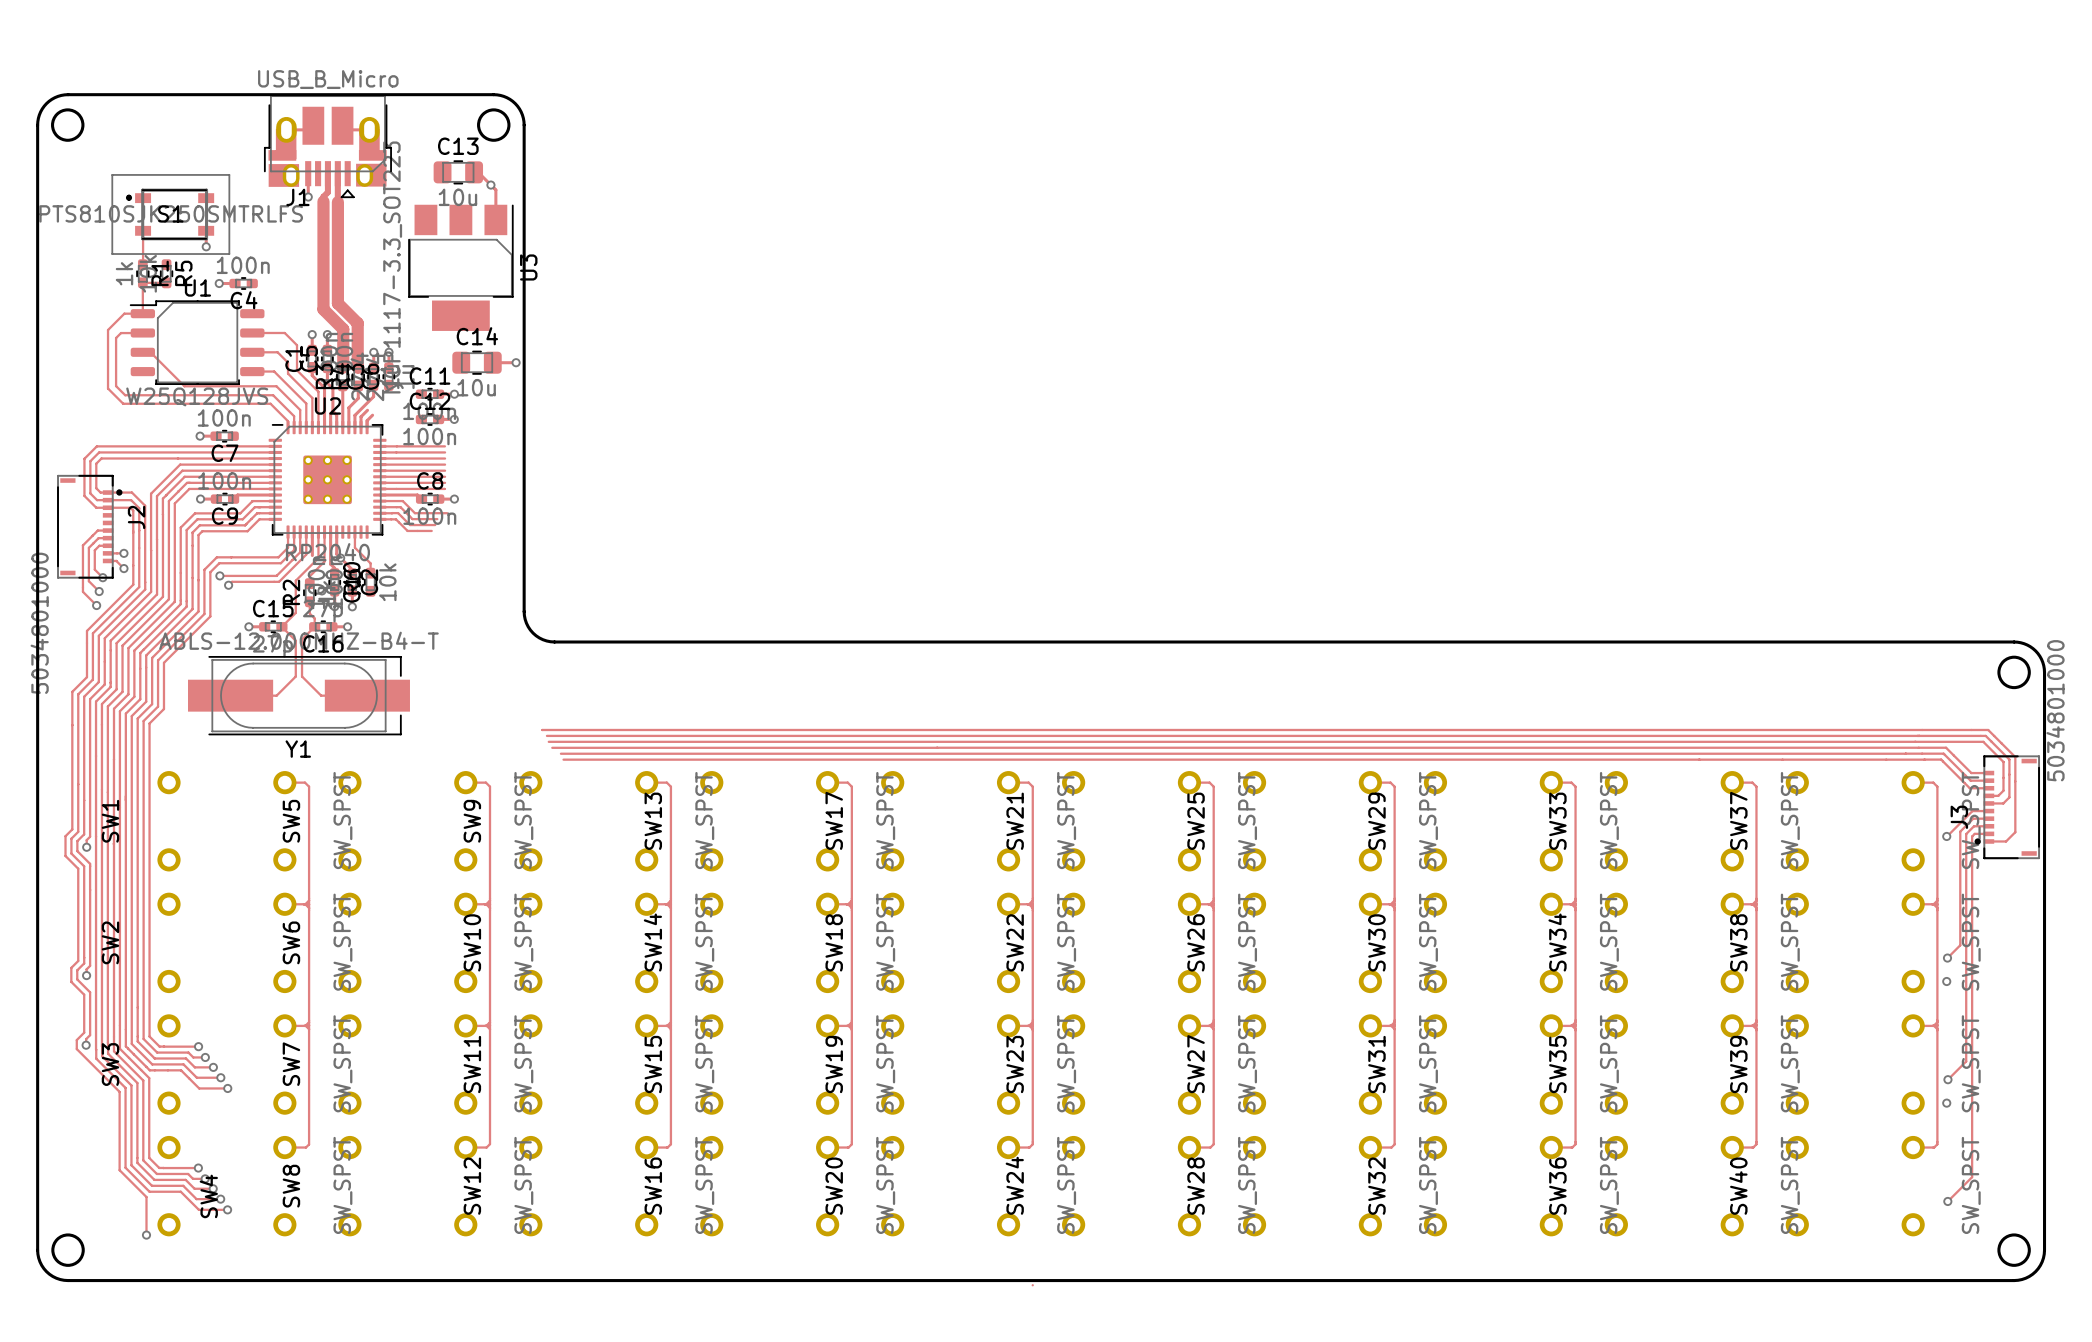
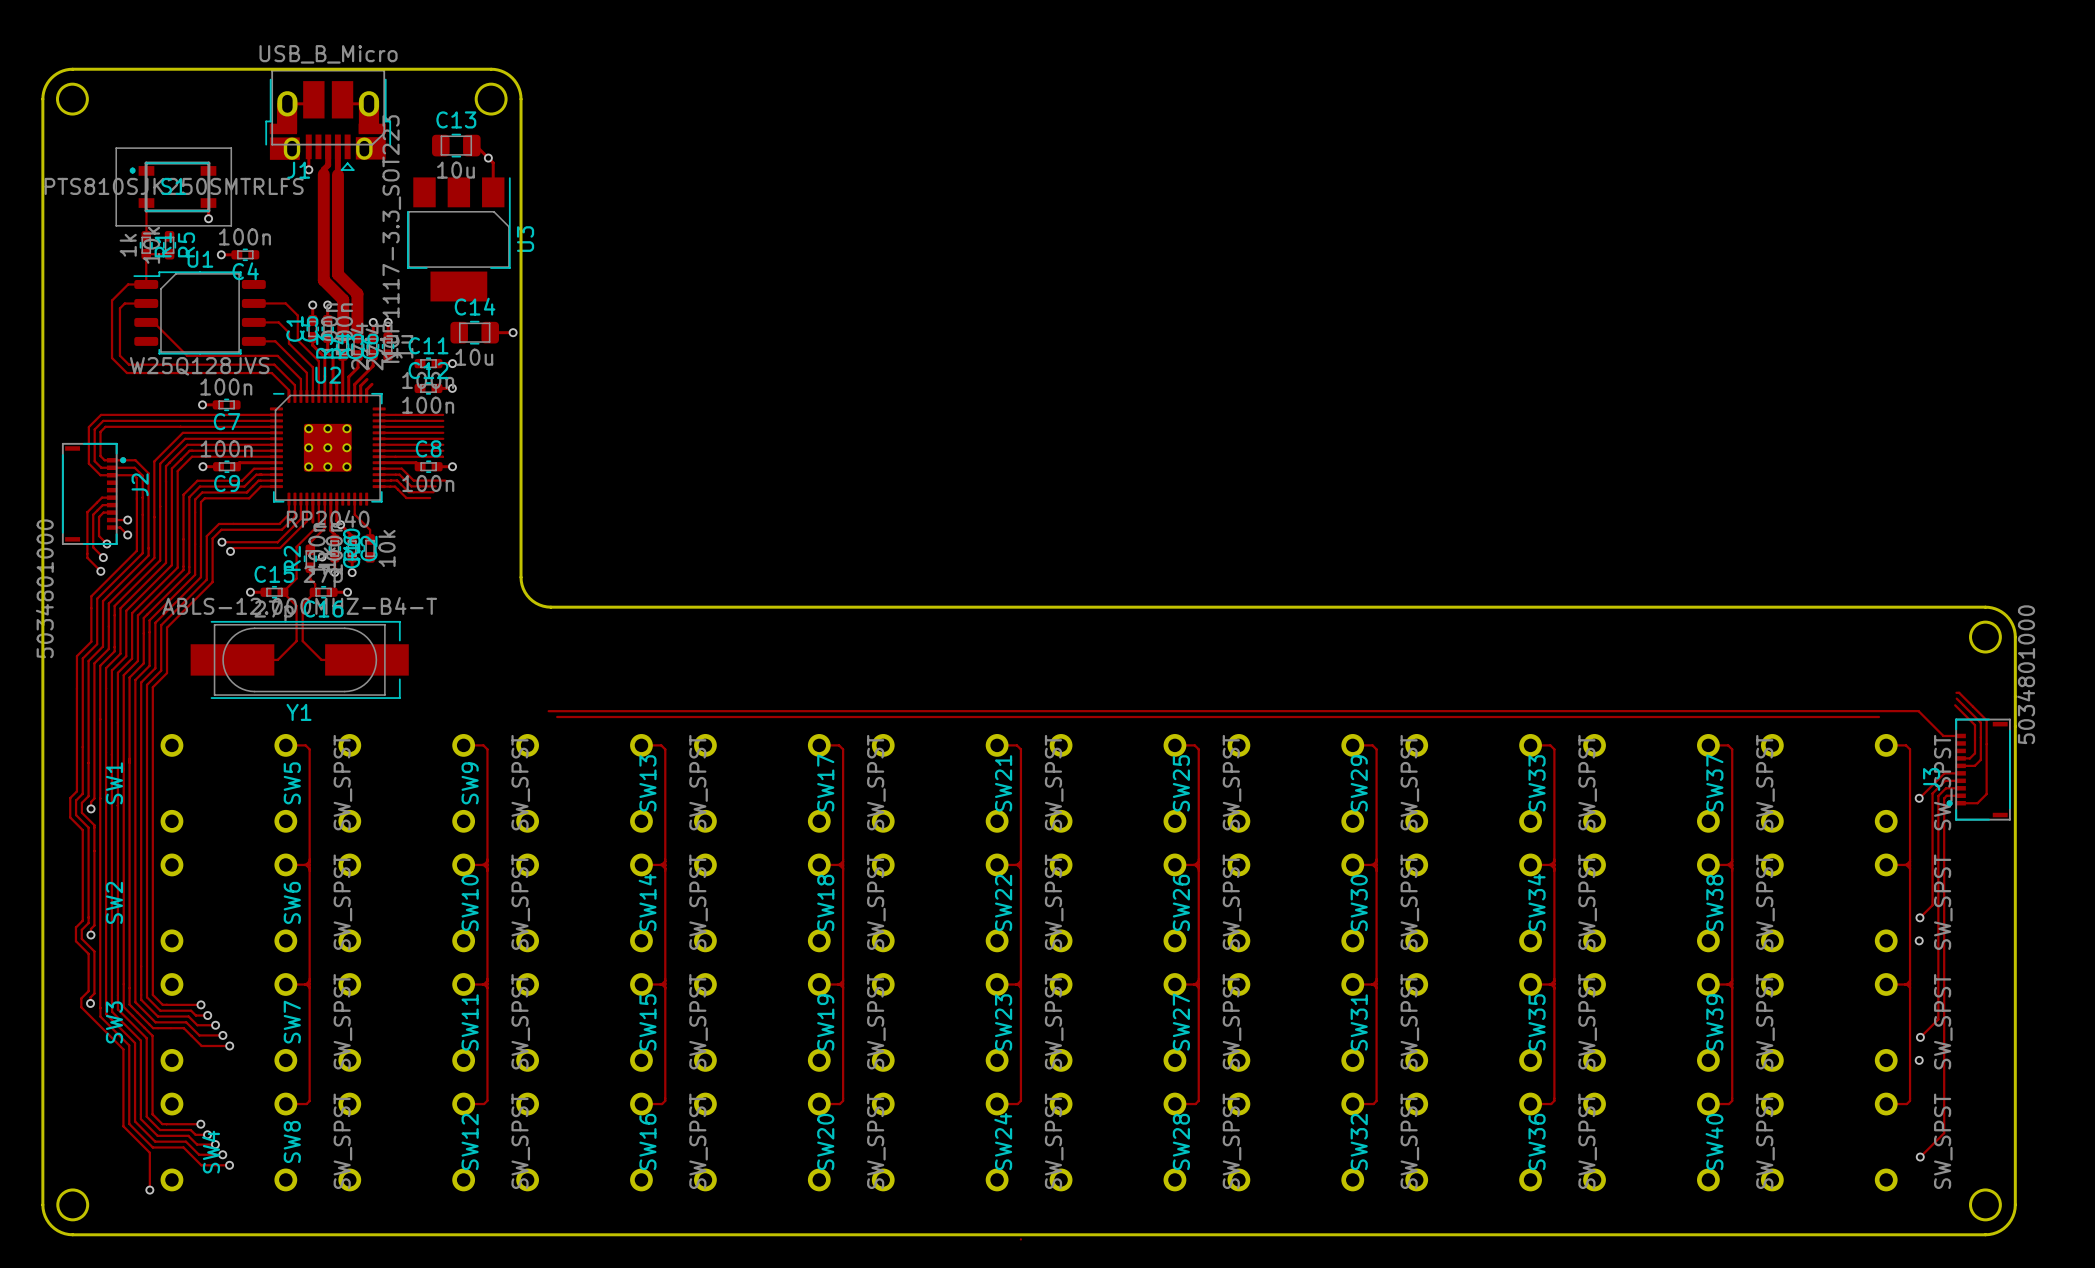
track: (542, 729) (1988, 729) -> (1956, 692) (1959, 693)
track: (546, 735) (1985, 735) -> (1956, 698) (1957, 699)
track: (548, 741) (1983, 741) -> none
track: (1905, 753) (1943, 753) (1970, 780) (1988, 780) -> none
track: (563, 759) (1924, 759) -> none
track: (1924, 759) (1941, 759) (1969, 788) (1988, 788) -> none

